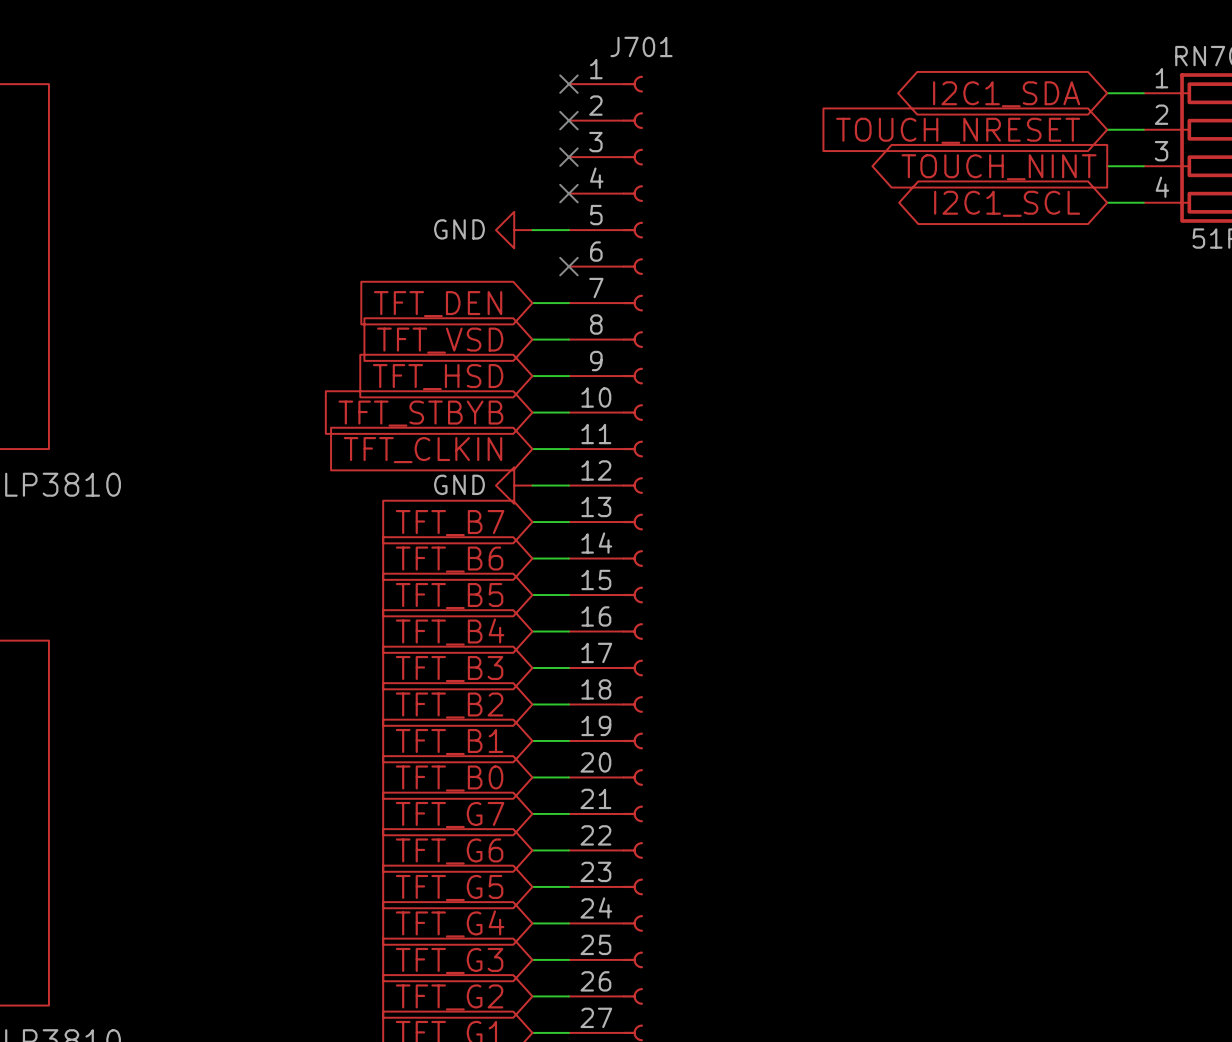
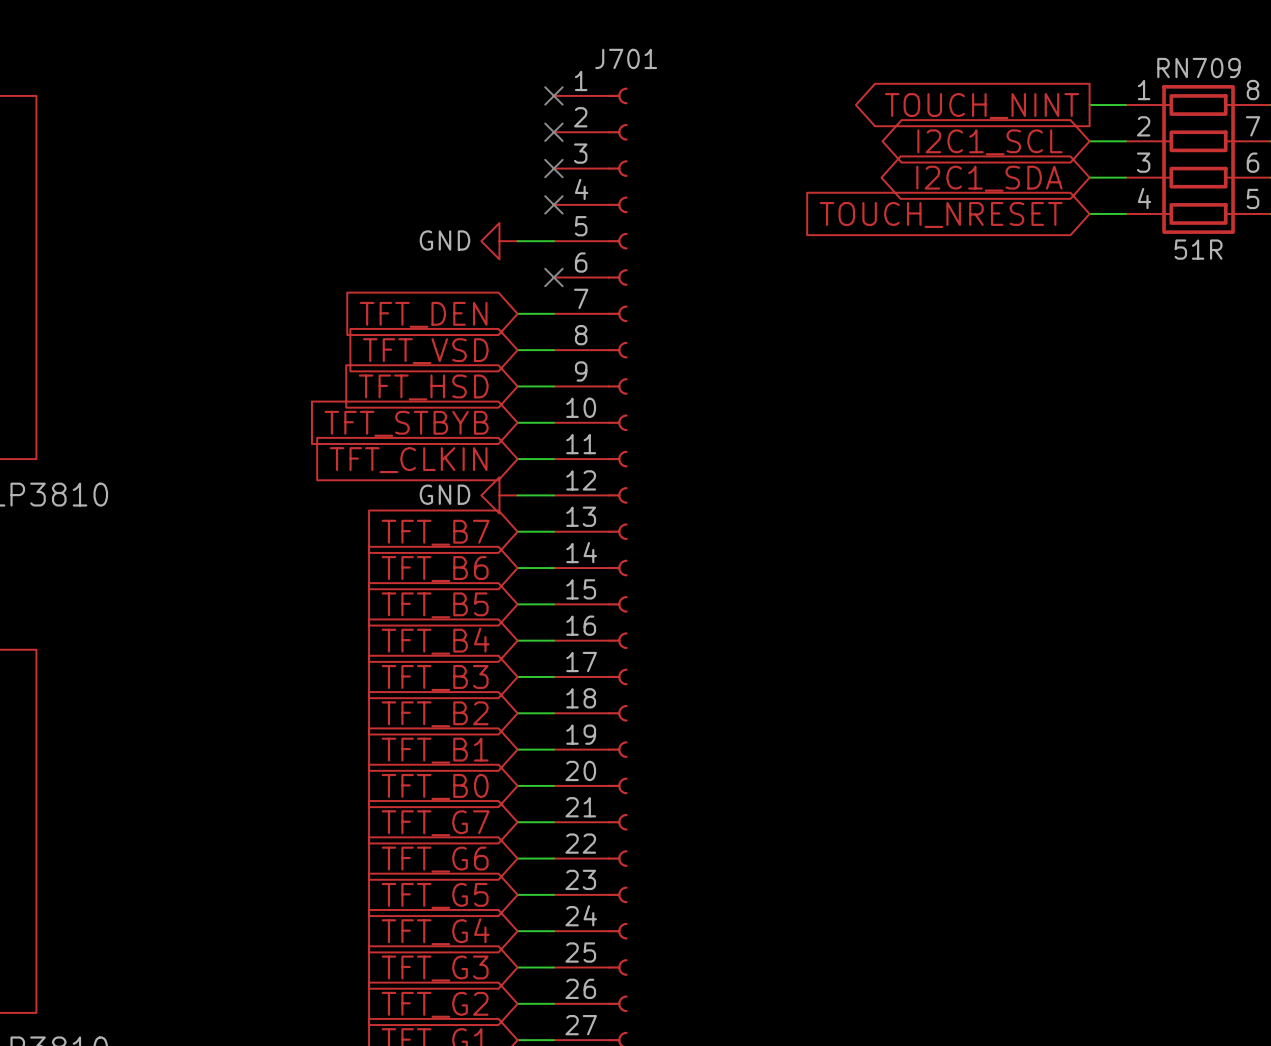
global label shape: bidirectional (1006, 94) -> output (981, 106)
global label: I2C1_SDA (1006, 94) -> TOUCH_NINT (981, 106)
global label shape: input (958, 130) -> bidirectional (989, 142)
global label: TOUCH_NRESET (958, 130) -> I2C1_SCL (989, 142)
global label shape: output (999, 167) -> bidirectional (989, 178)
global label: TOUCH_NINT (999, 167) -> I2C1_SDA (989, 178)
global label shape: bidirectional (1007, 203) -> input (941, 214)
global label: I2C1_SCL (1007, 203) -> TOUCH_NRESET (941, 214)

